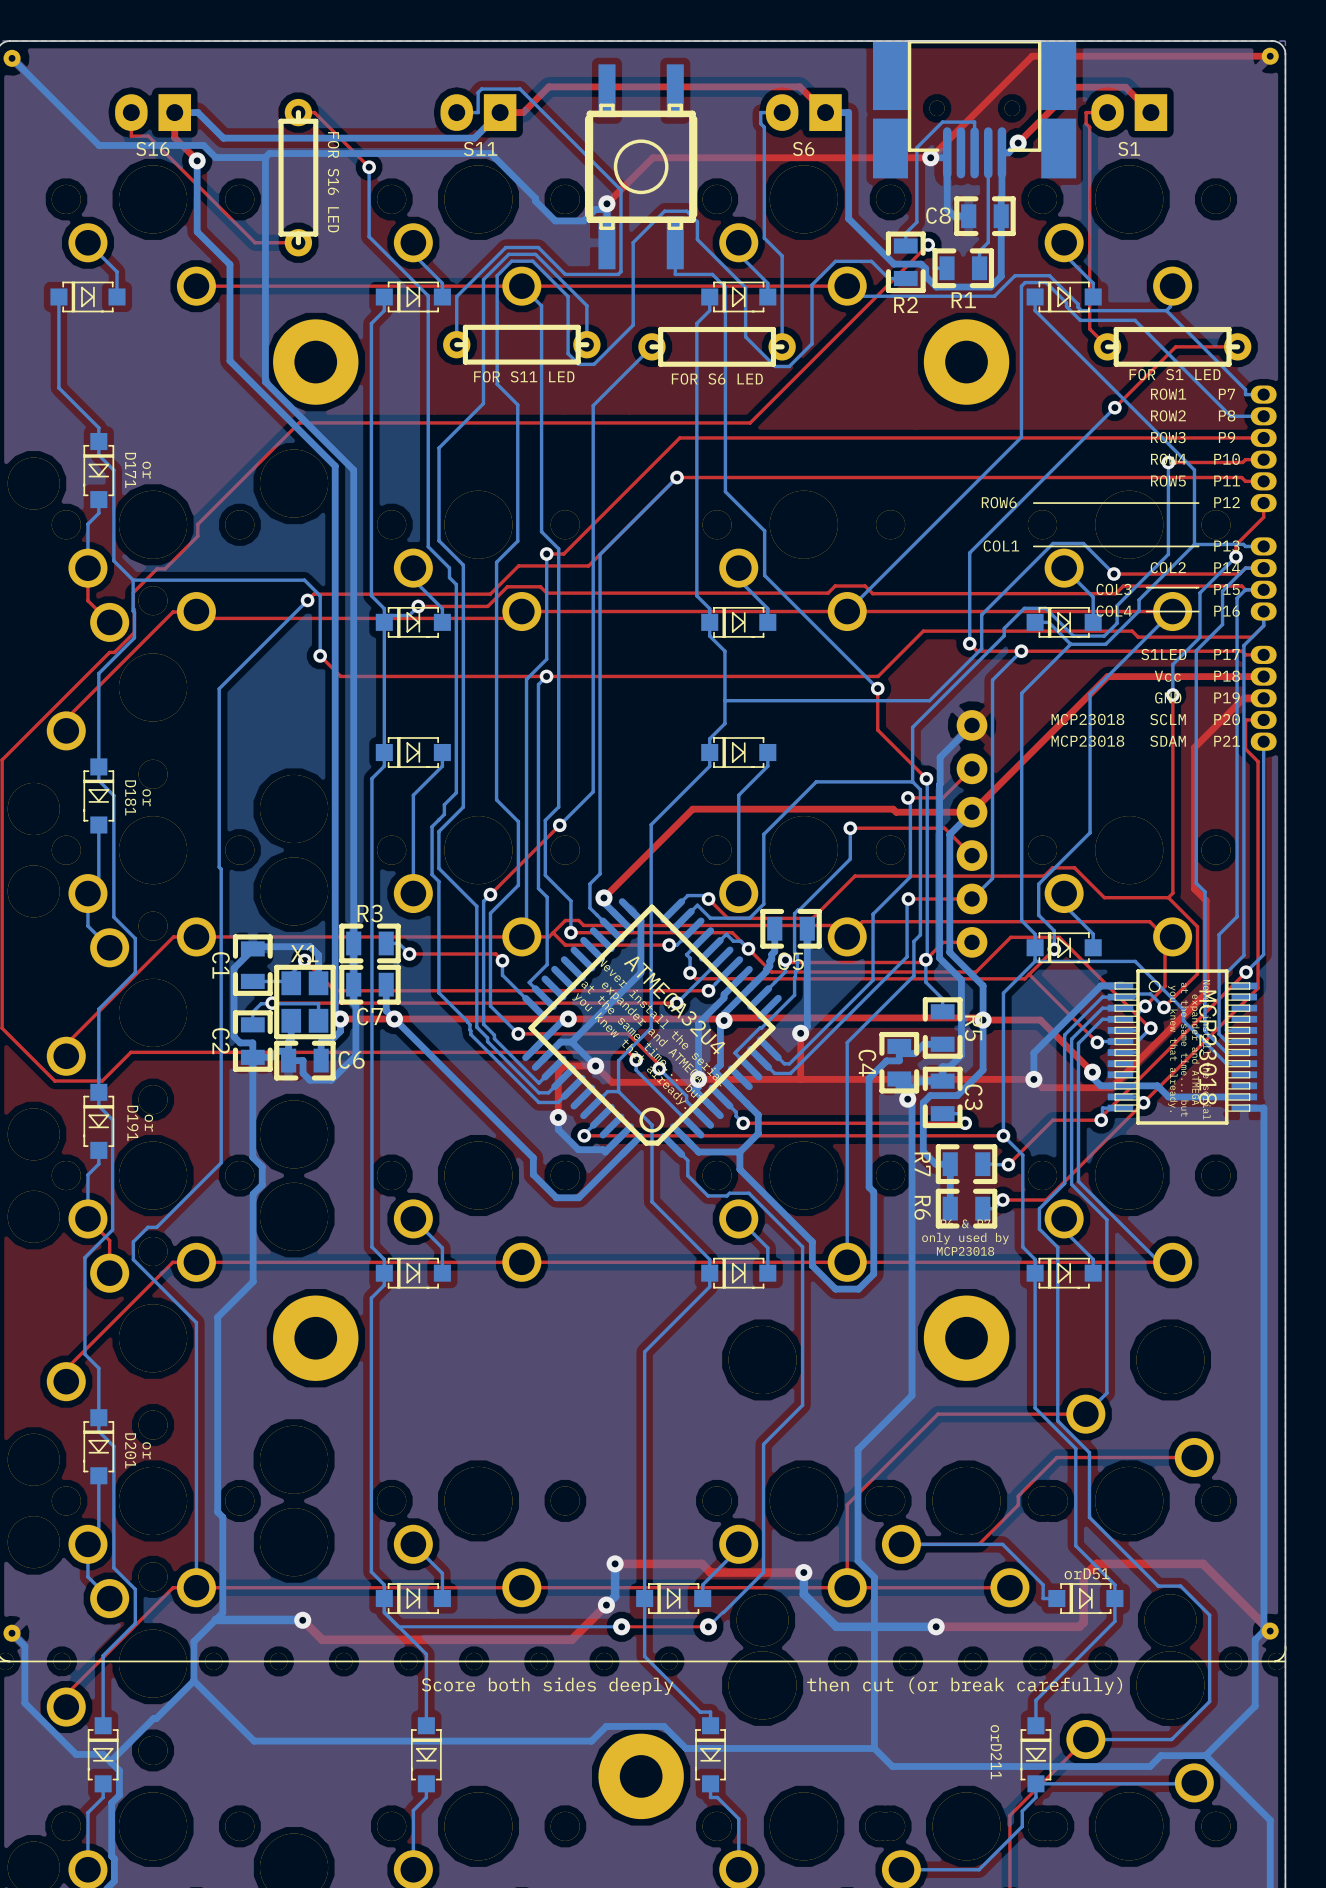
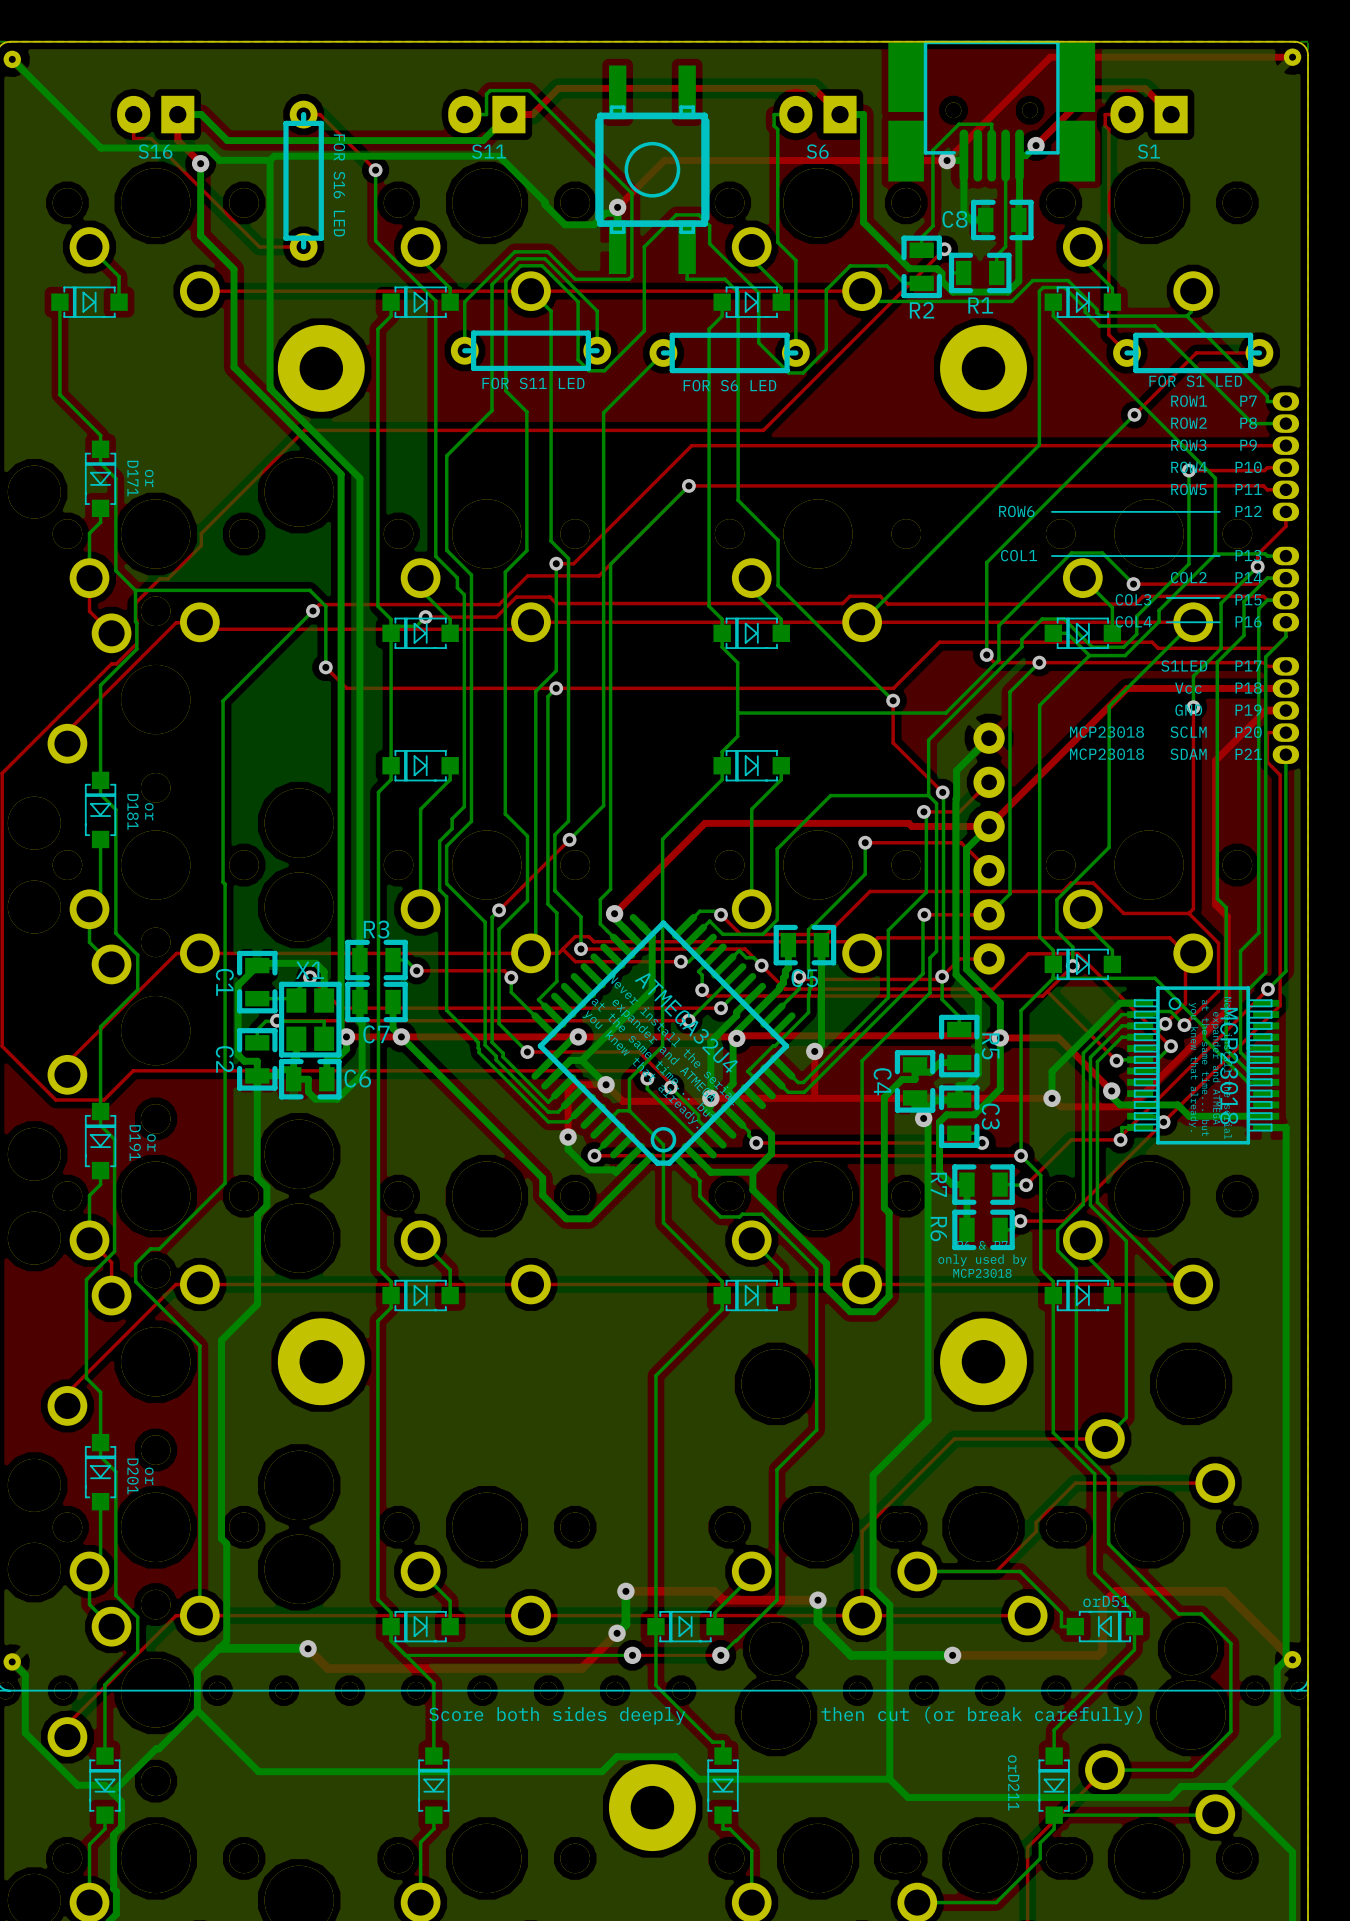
part rotation: 0° (1085, 1598) -> 180° (1104, 1626)

